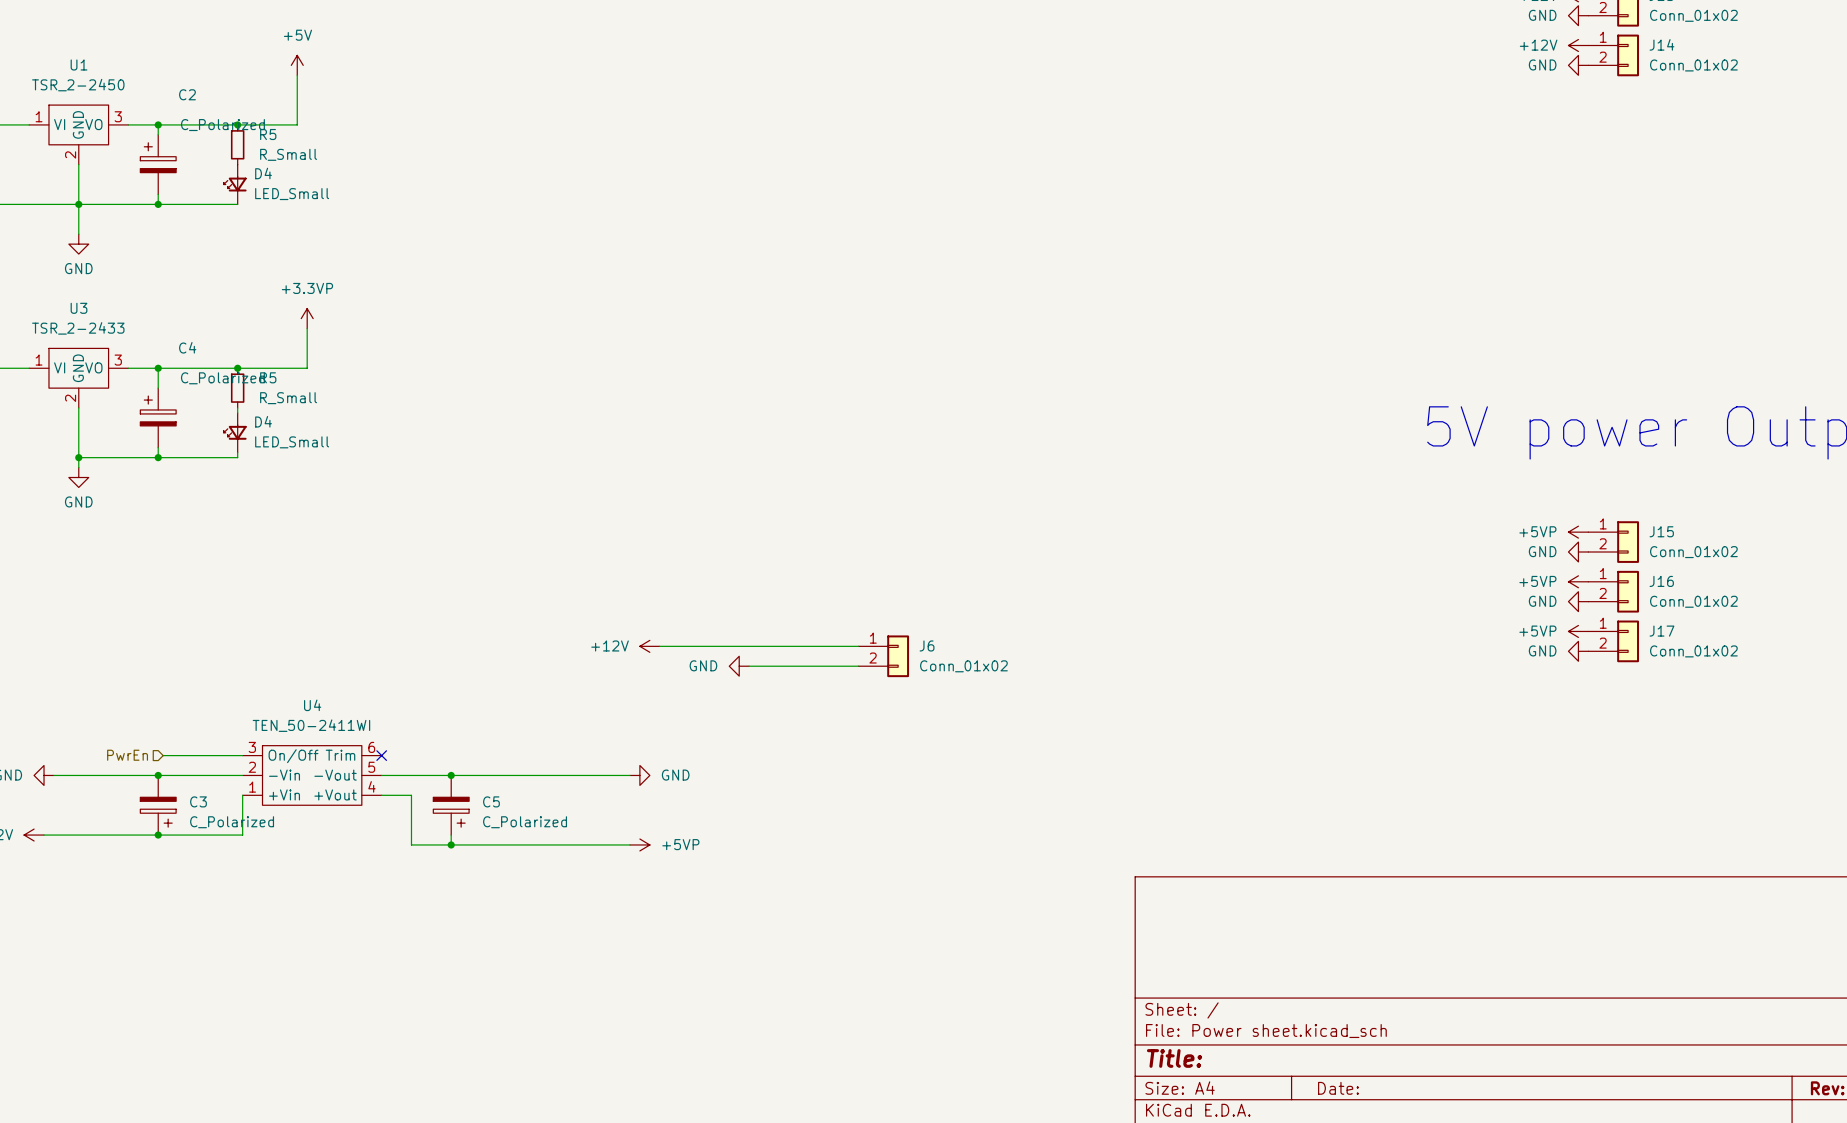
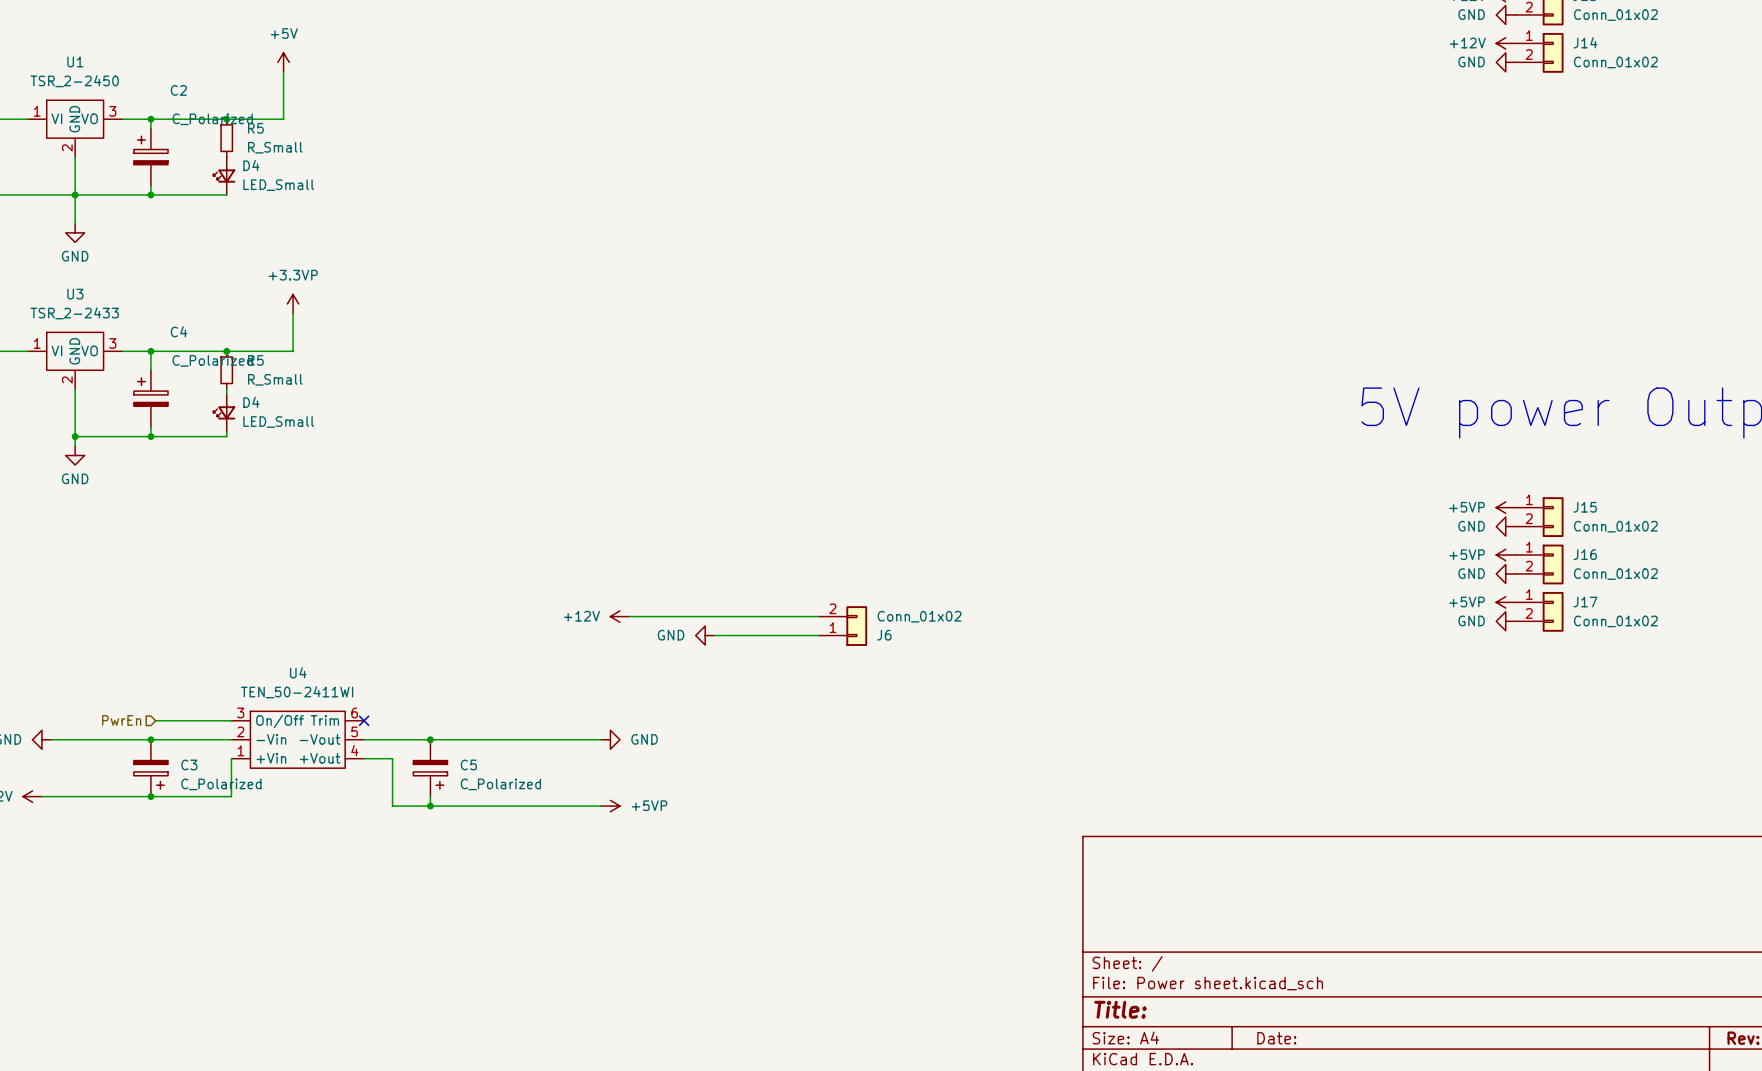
J6 flip: as is (898, 656) -> up-down (856, 626)

